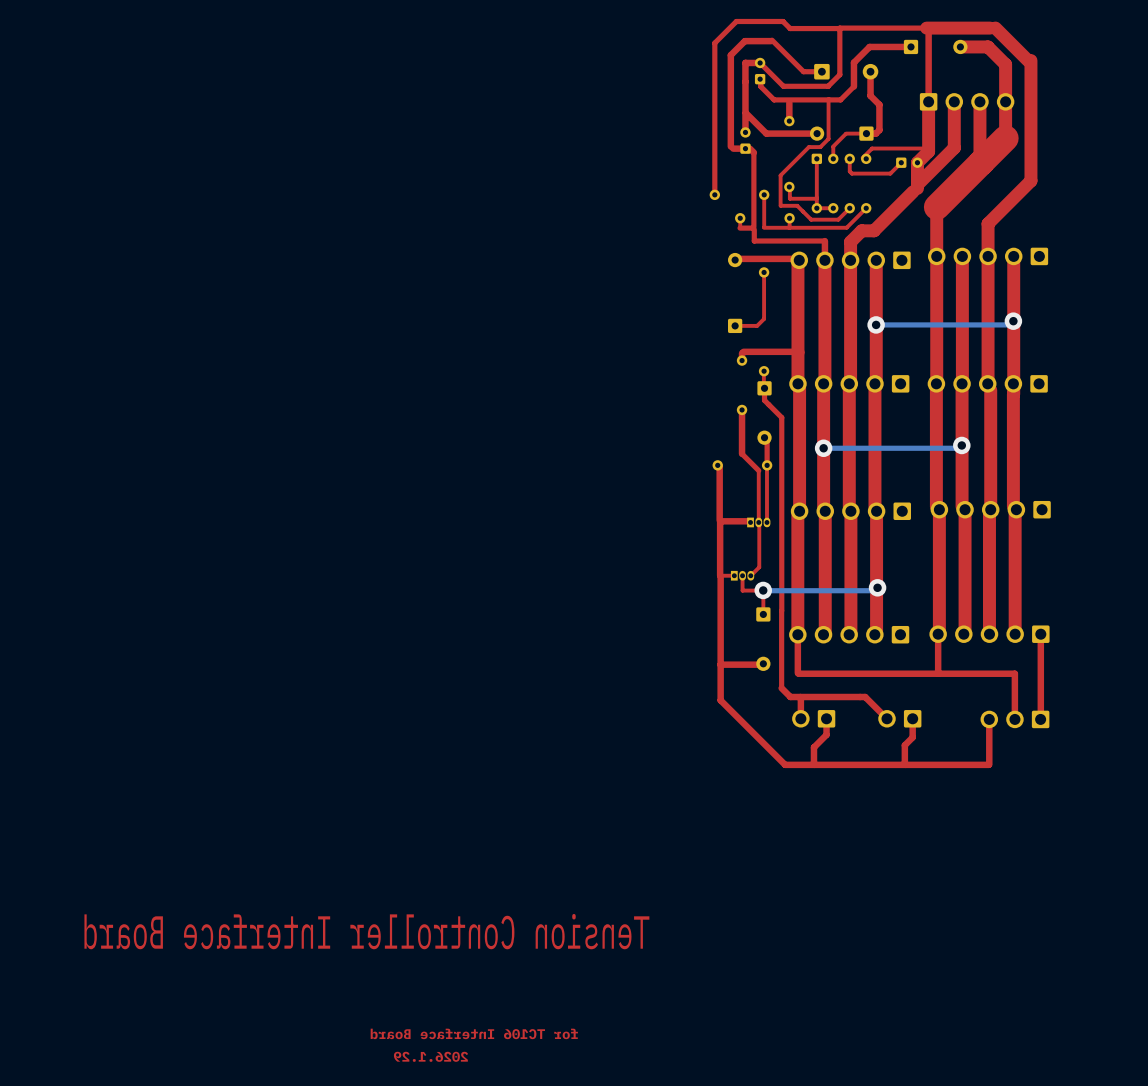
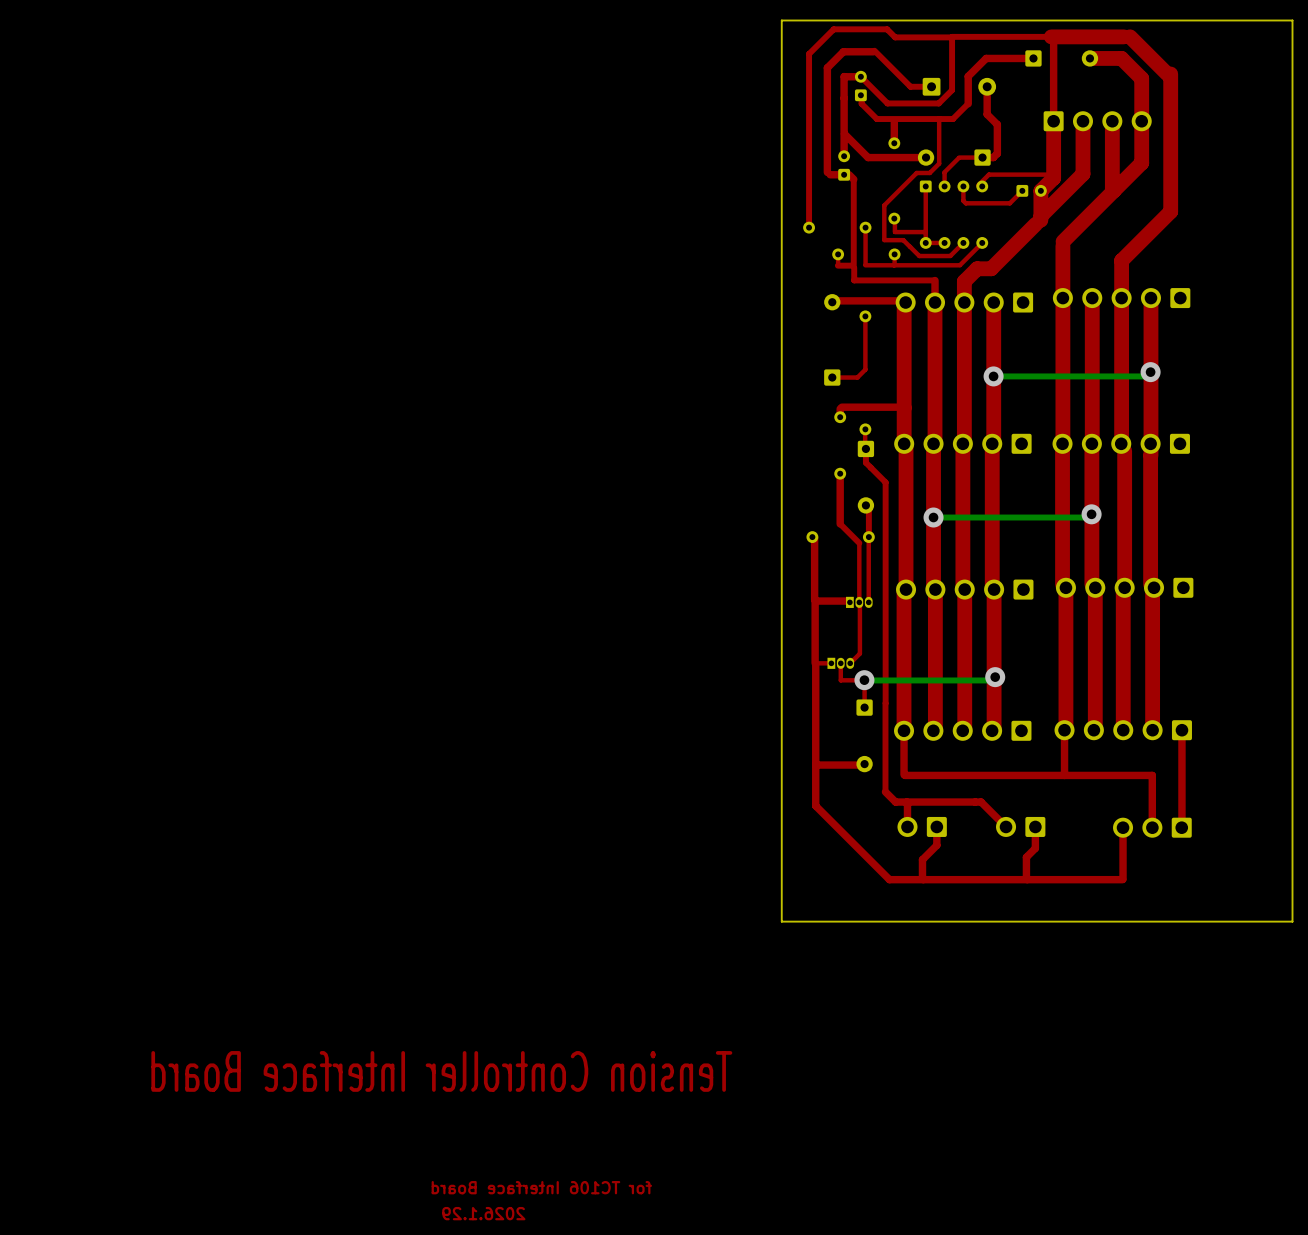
board edge: none -> (1292, 20) (781, 20) (781, 921) (1292, 921) (1292, 20)
top track width: thick (1005, 138) (936, 207) -> thin (1141, 162) (1063, 241)

